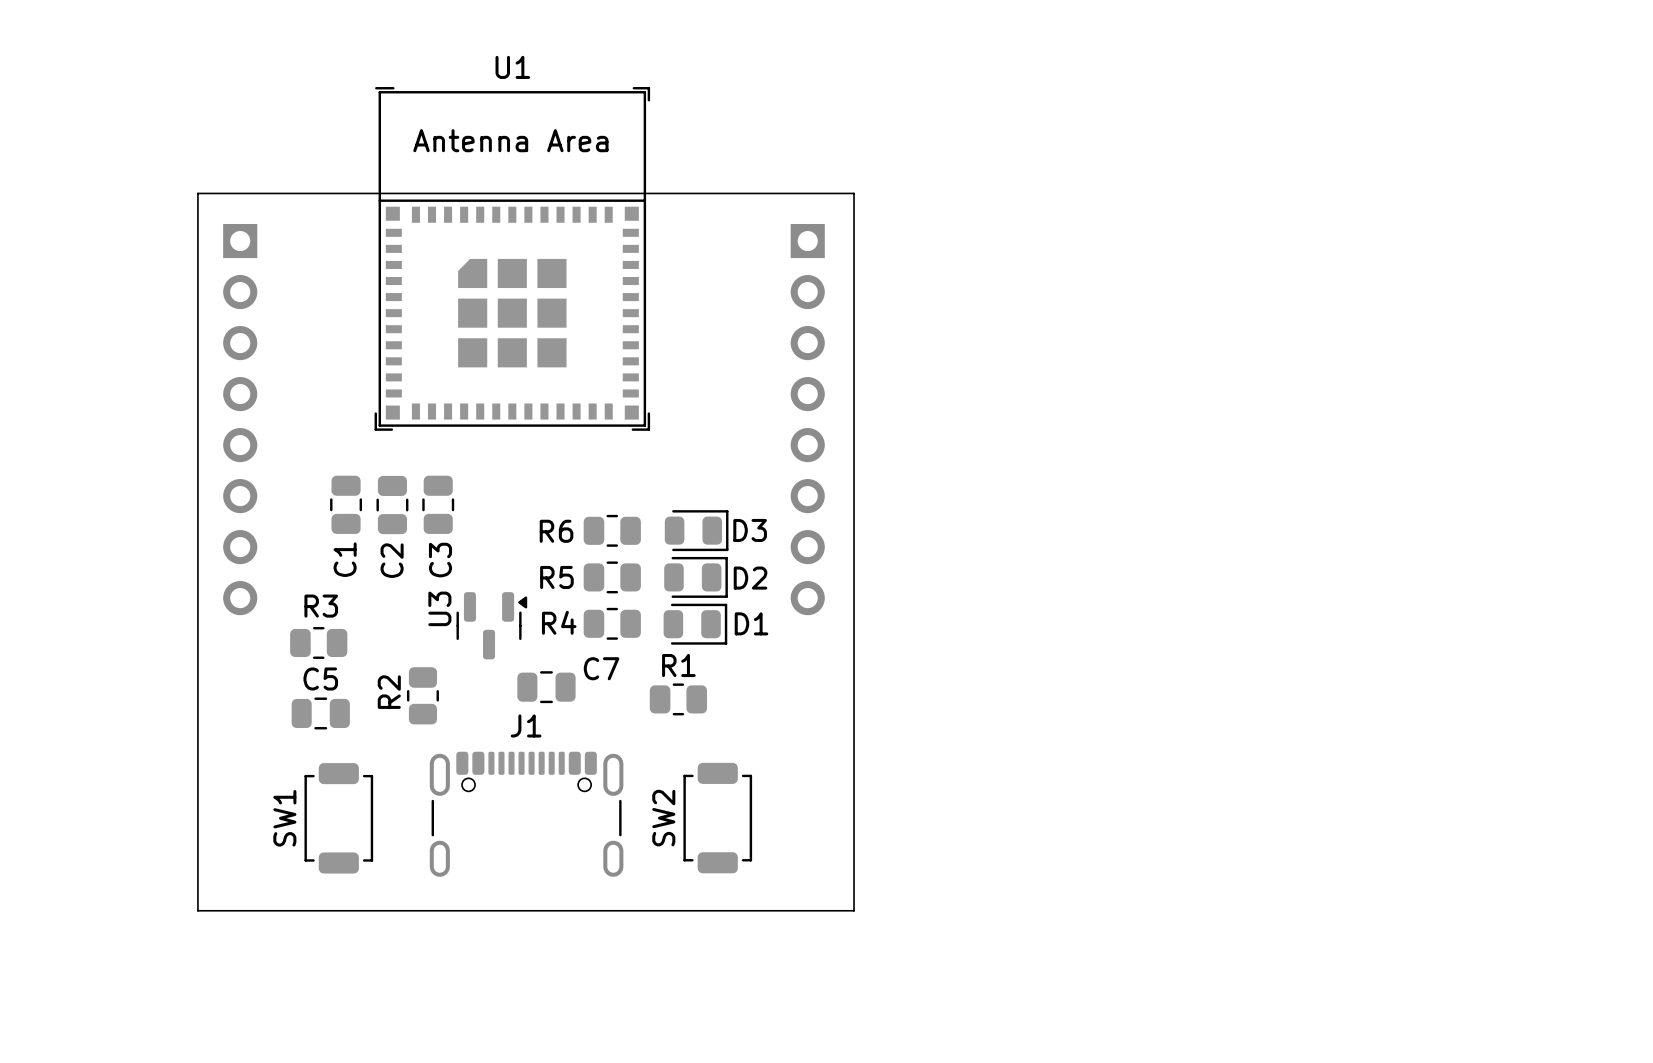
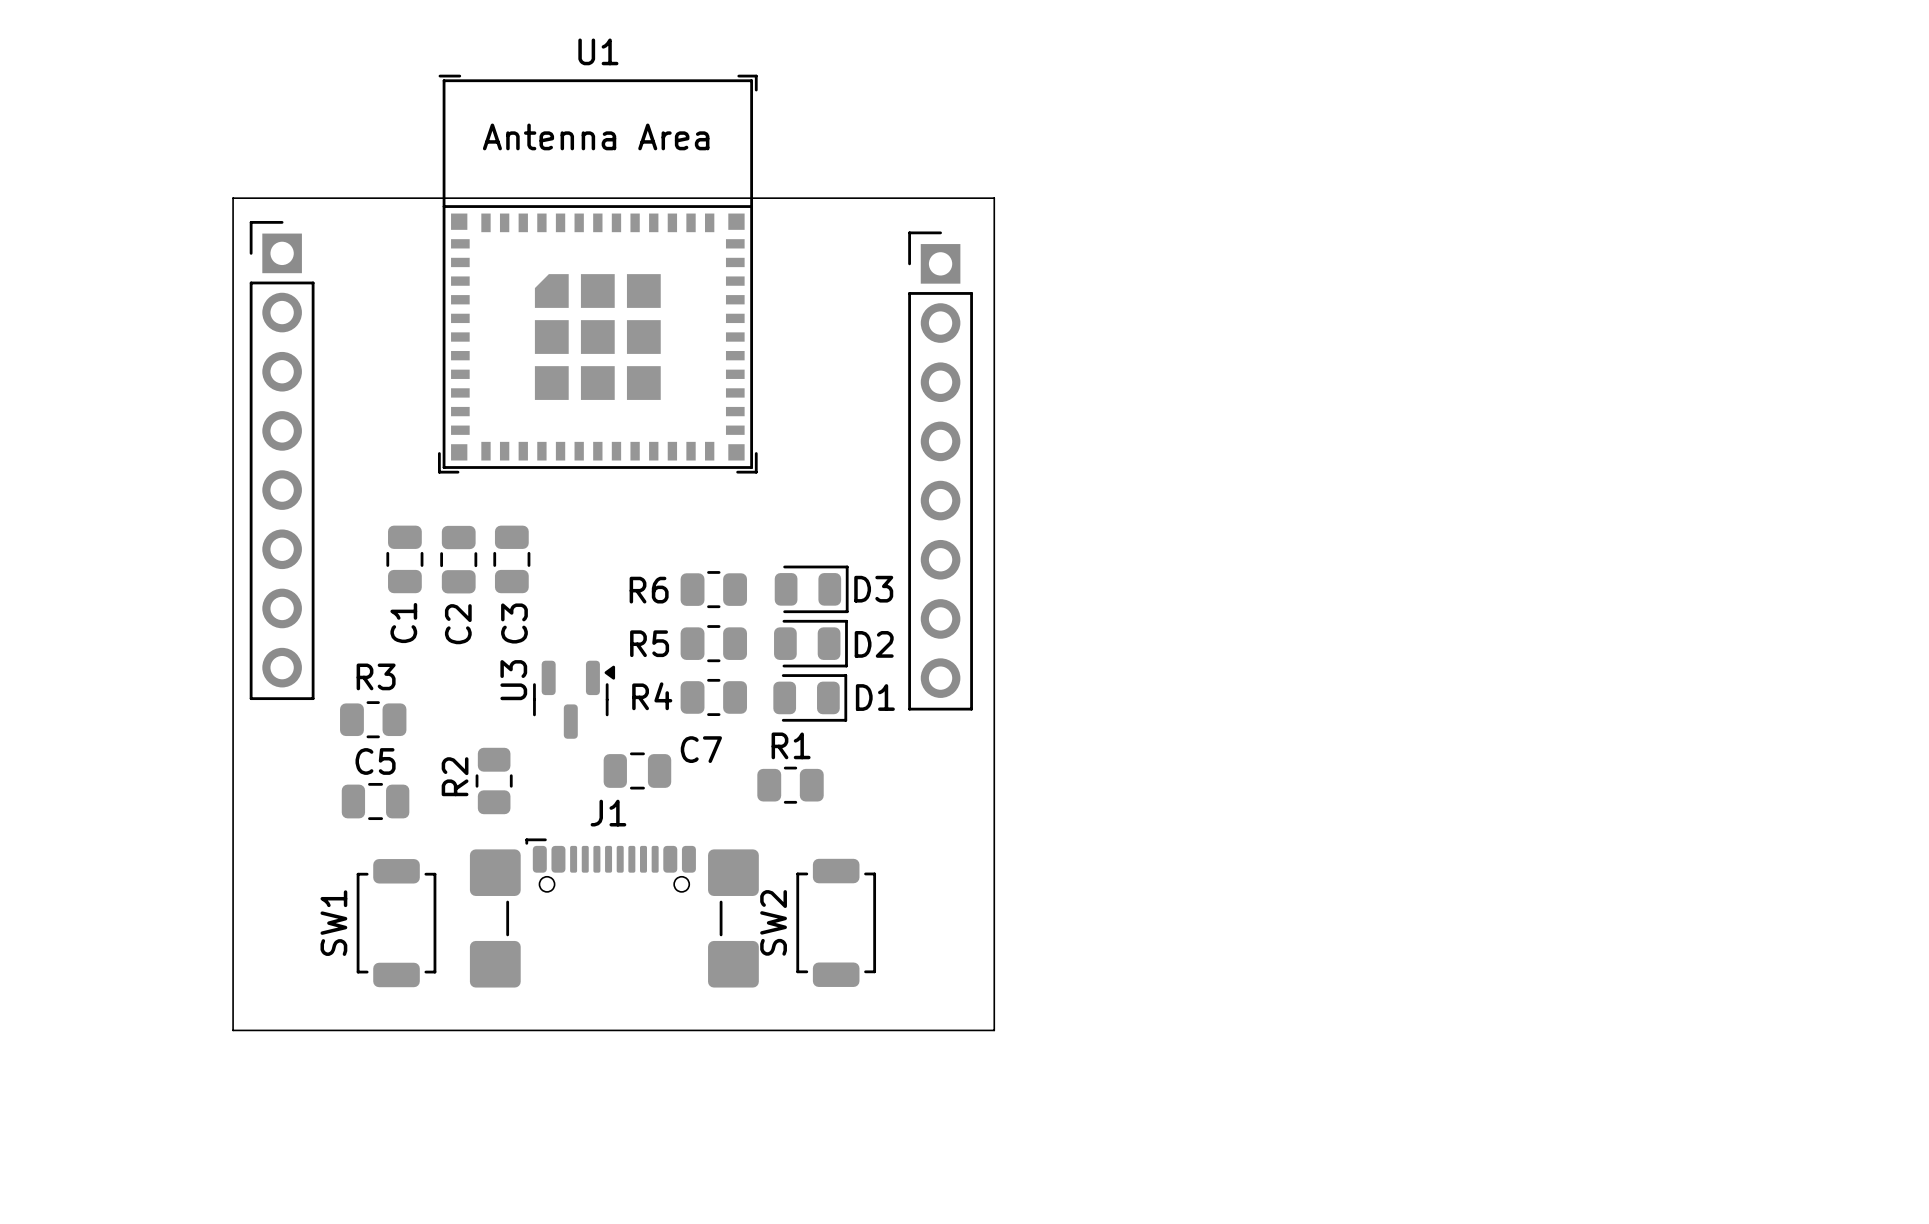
part side: bottom (240, 419) -> top (282, 460)
part side: bottom (807, 419) -> top (940, 470)
J1 footprint: [429, 751, 624, 877] -> [469, 838, 759, 988]

